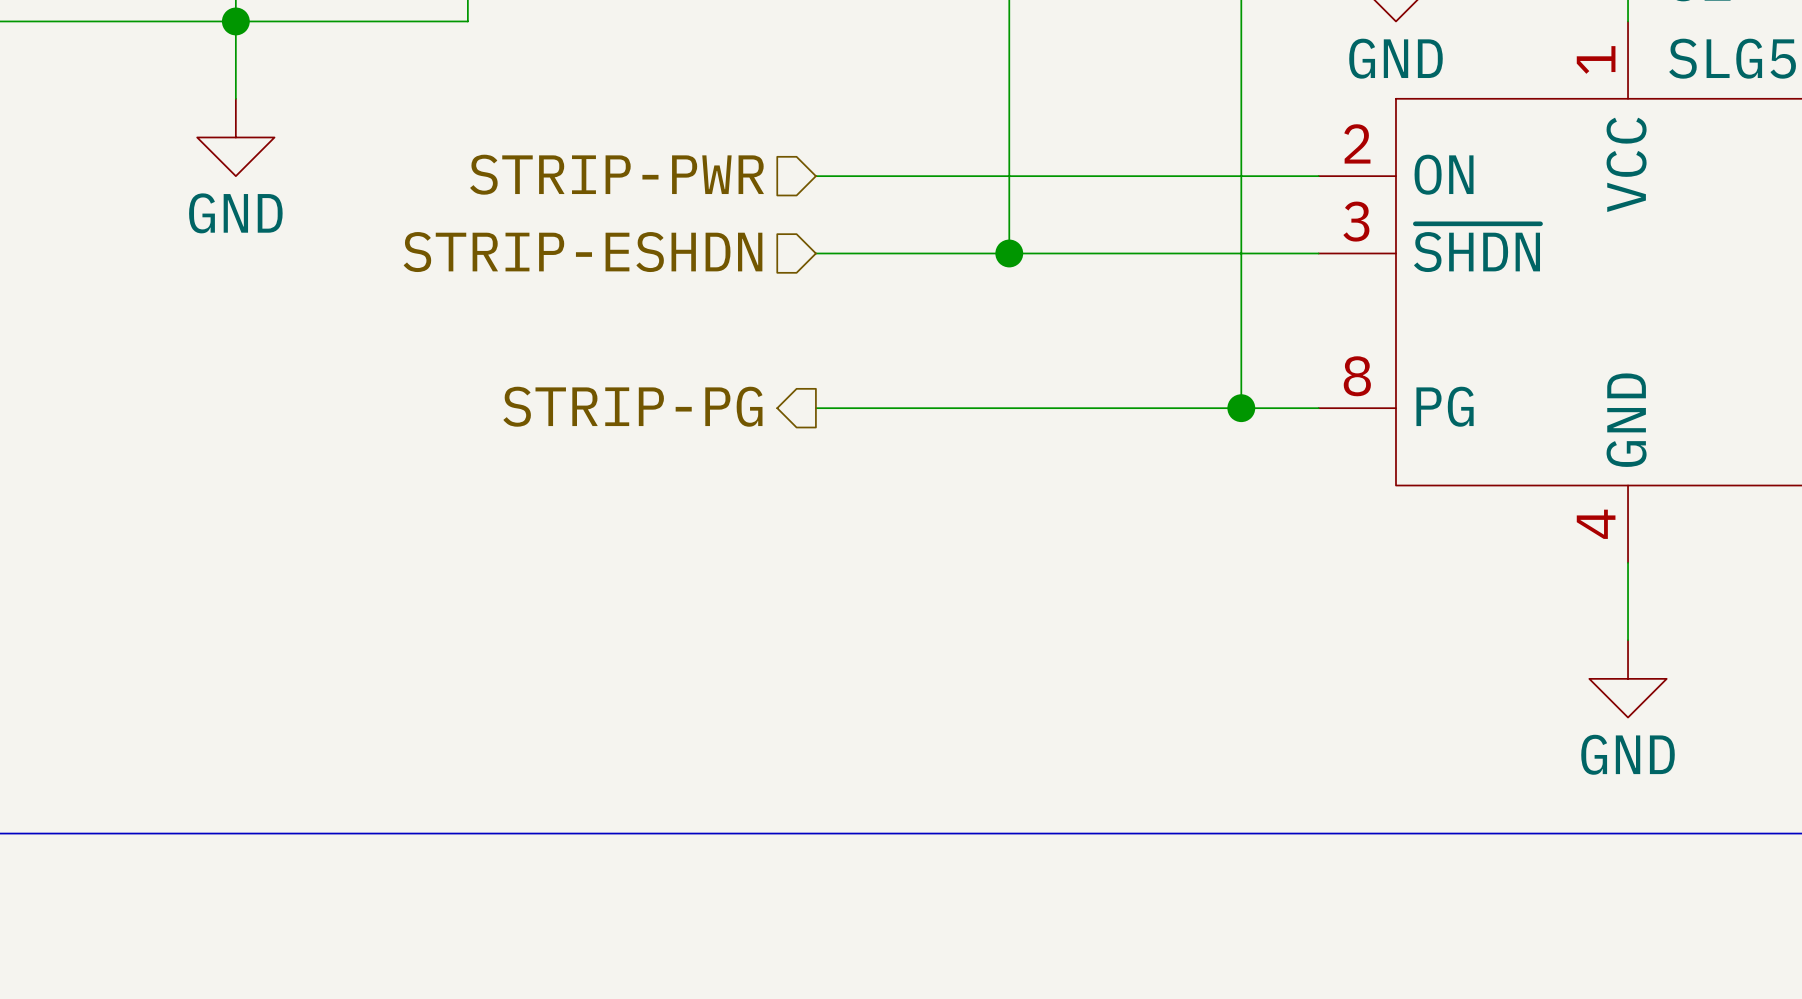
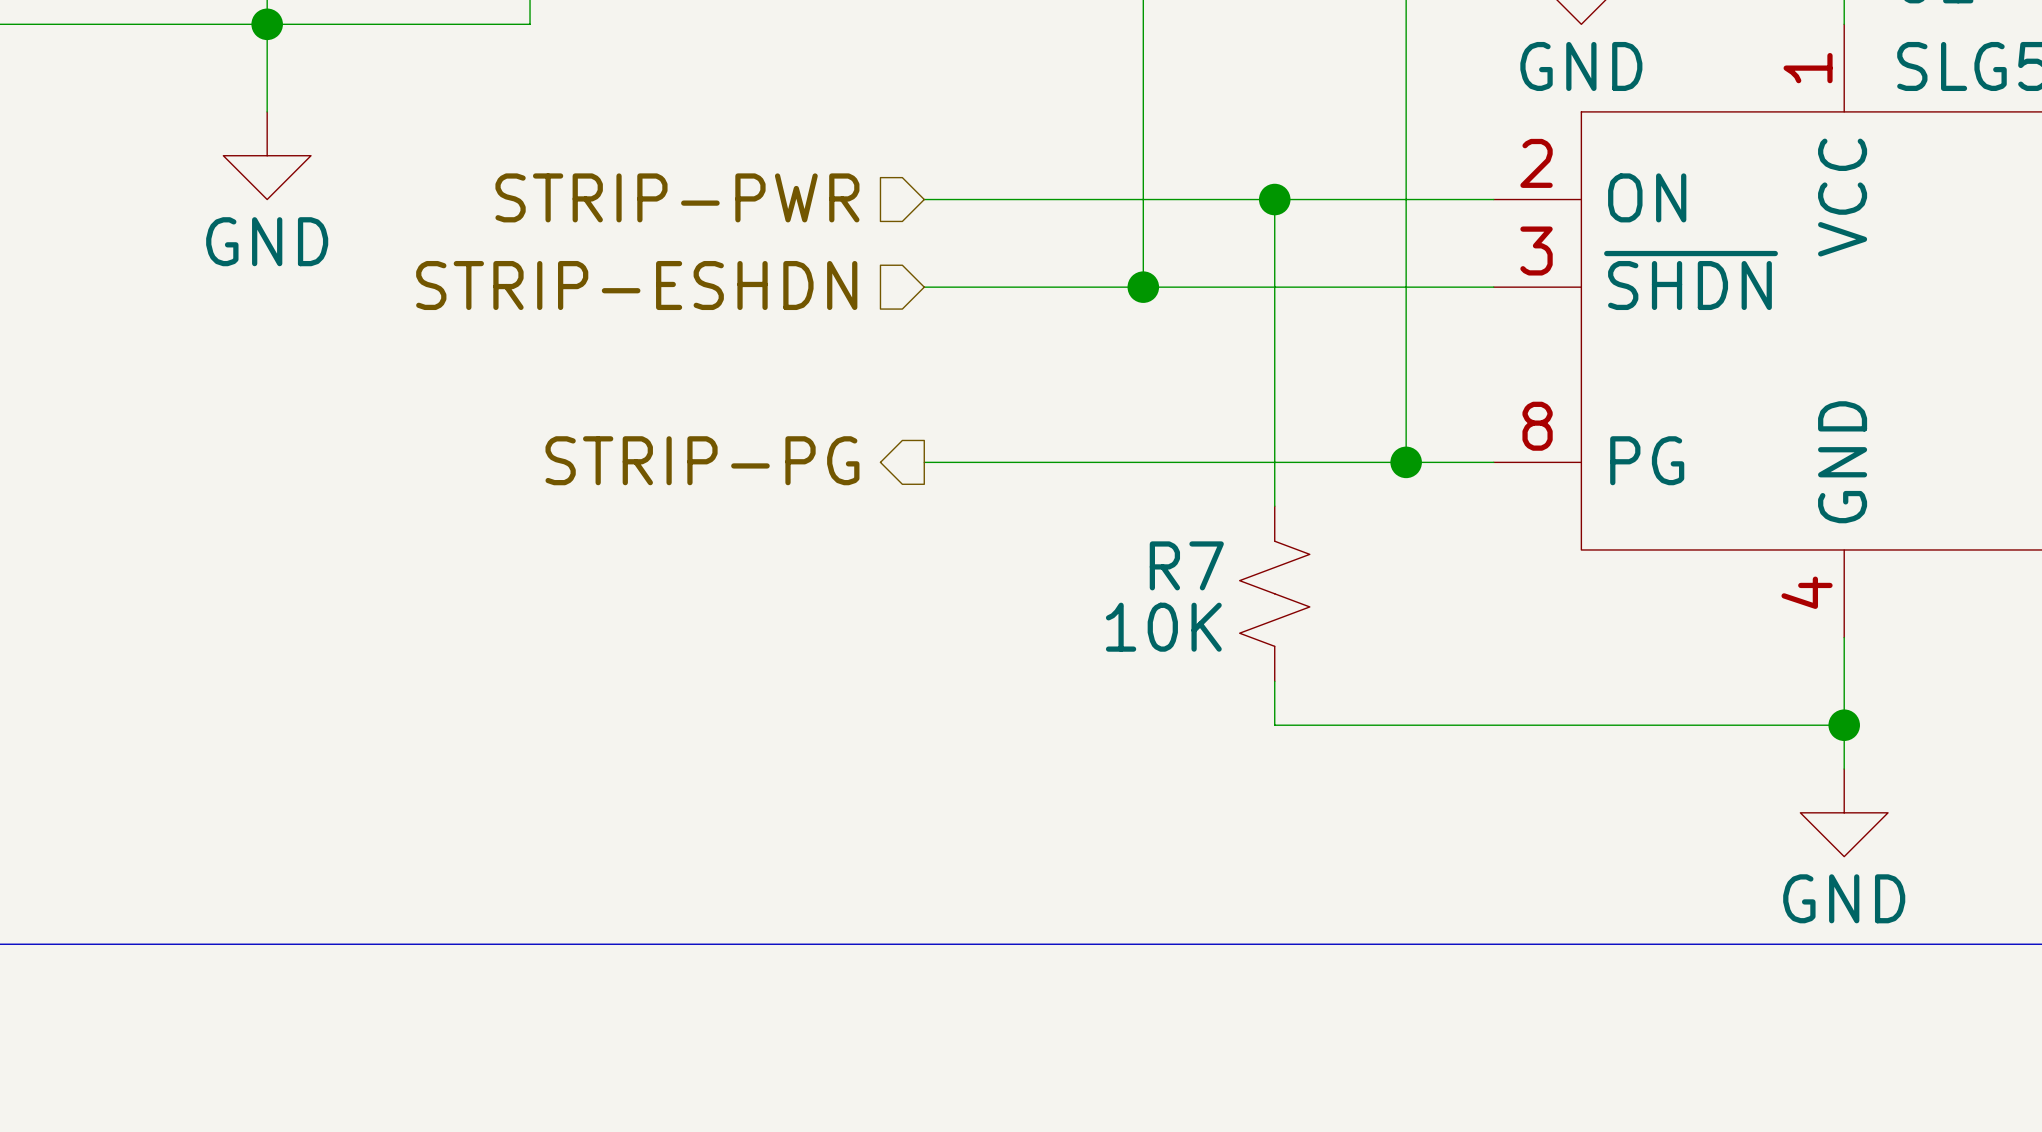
wire: none -> (1274, 199) (1274, 506)
junction: none -> (1274, 199)
R7: none -> 10K (1274, 593)
wire: none -> (1274, 681) (1274, 725) (1844, 725) (1844, 769)
junction: none -> (1844, 725)
power symbol position: GND (1628, 678) -> GND (1844, 812)

